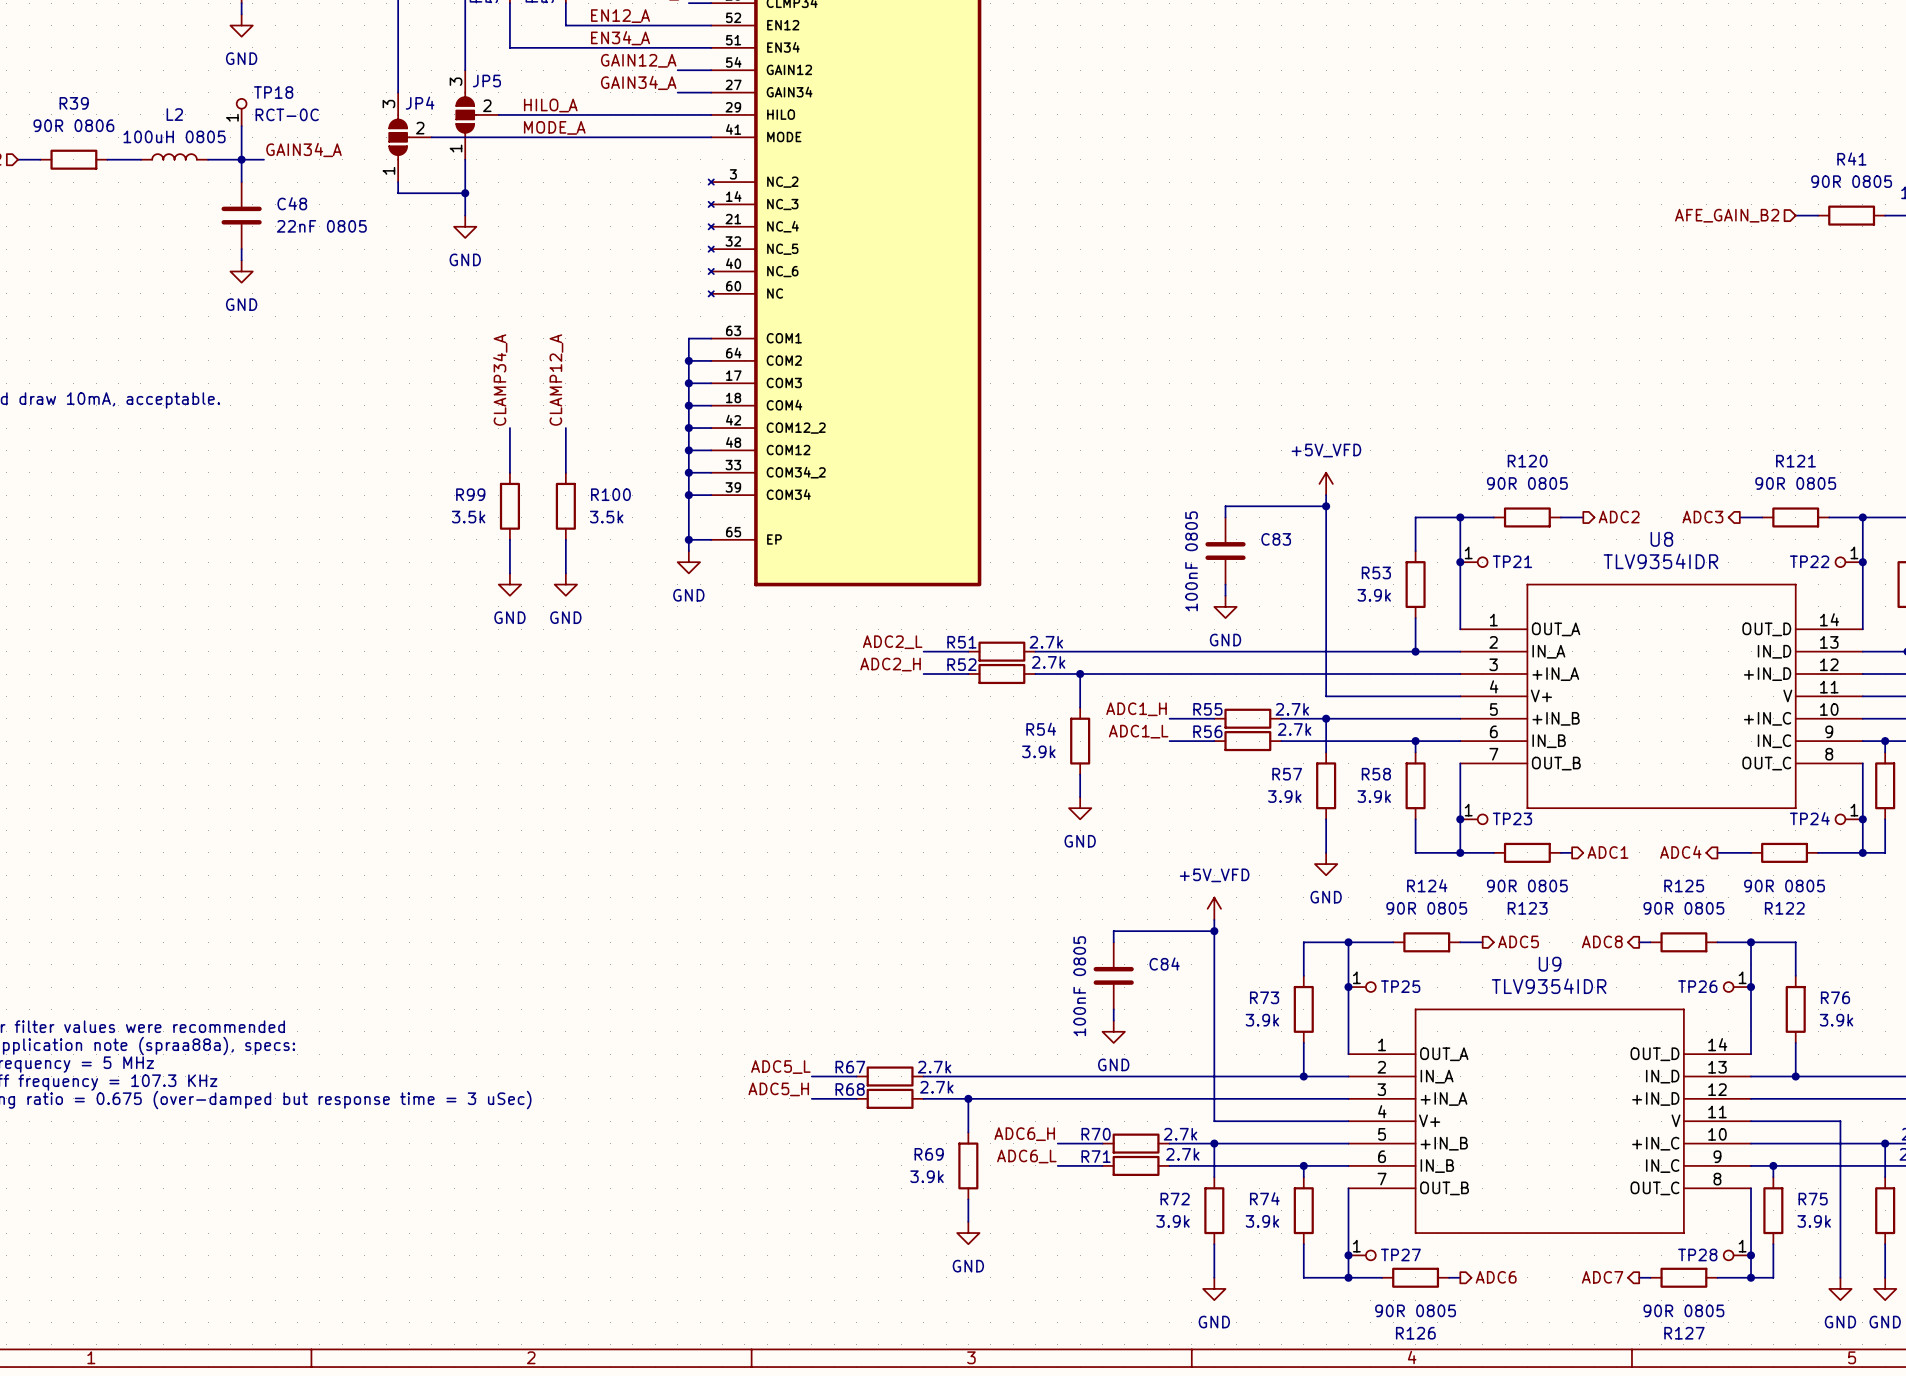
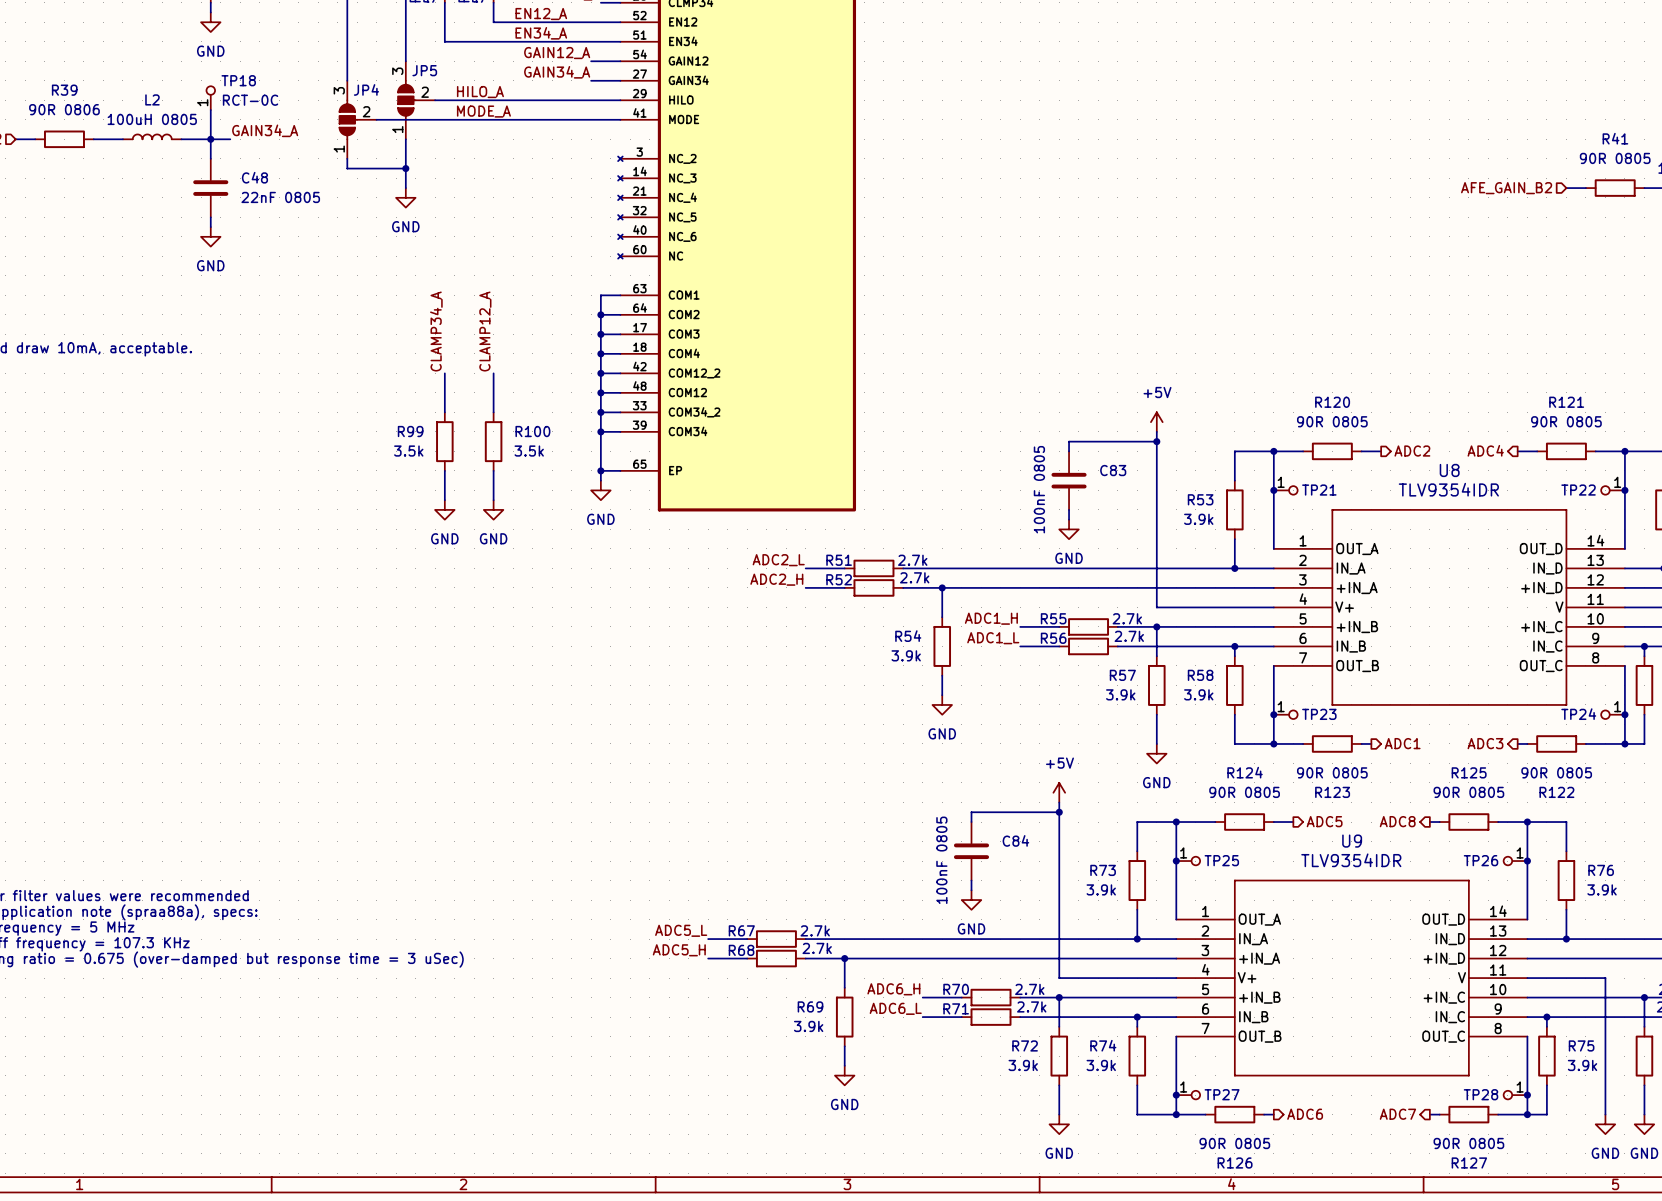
power symbol: +5V_VFD (1326, 483) -> +5V (1156, 422)
hierarchical label: ADC3 (1702, 517) -> ADC4 (1485, 450)
hierarchical label: ADC4 (1680, 852) -> ADC3 (1485, 743)
wire: (1717, 852) (1739, 852) -> none
power symbol: +5V_VFD (1214, 908) -> +5V (1059, 792)

